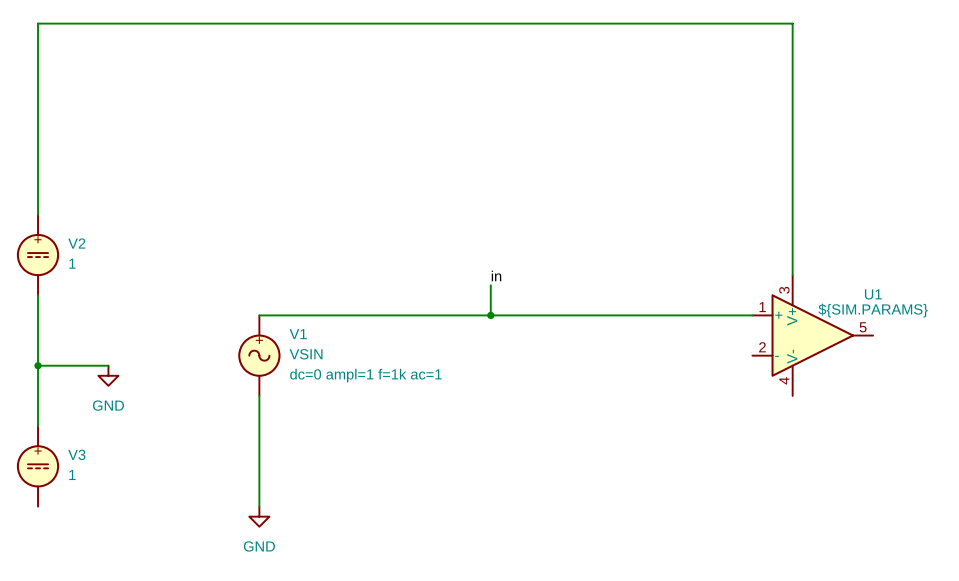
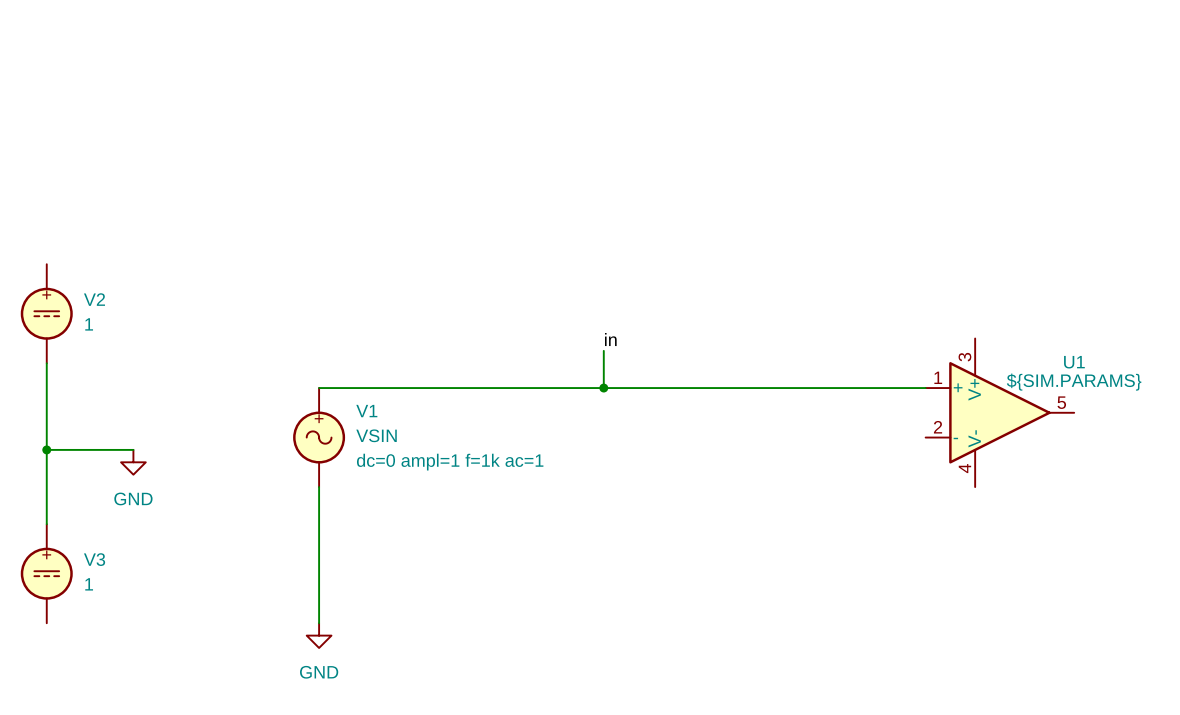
wire: (38, 214) (38, 23) (792, 23) (792, 275) -> none

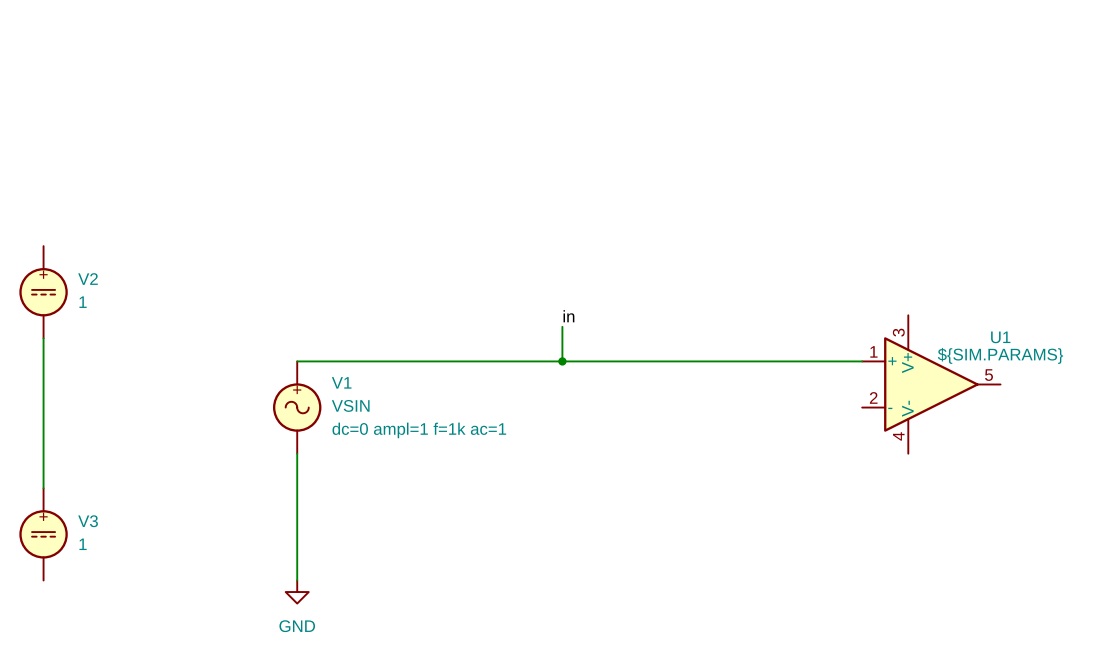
wire: (46, 449) (133, 449) -> none
junction: (46, 449) -> none
power symbol: GND (133, 462) -> none

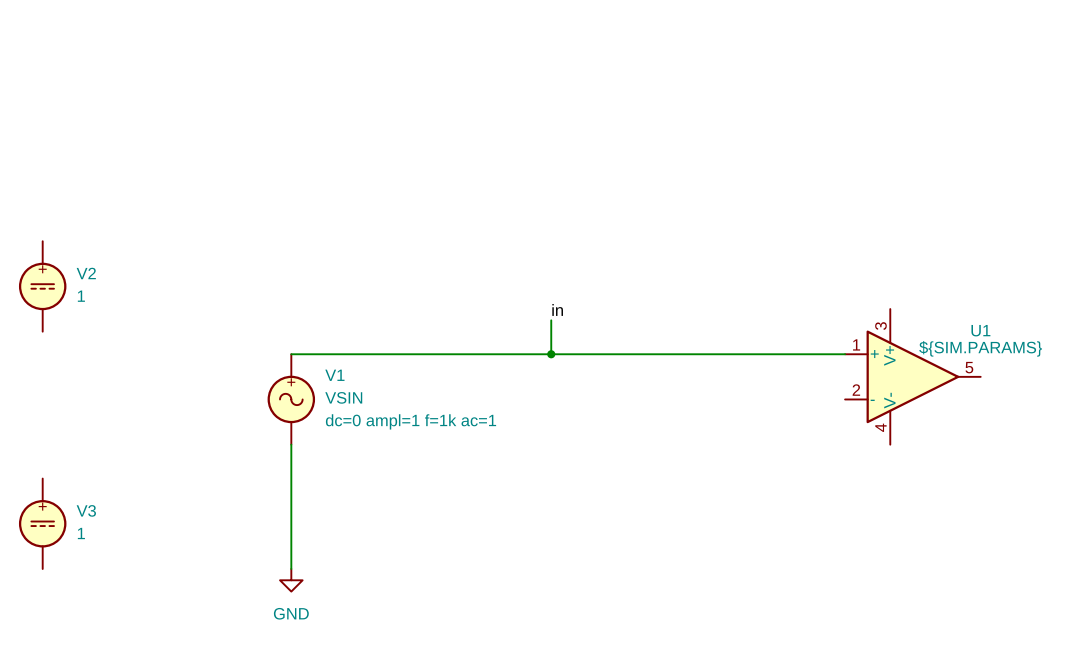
wire: (43, 338) (43, 488) -> none

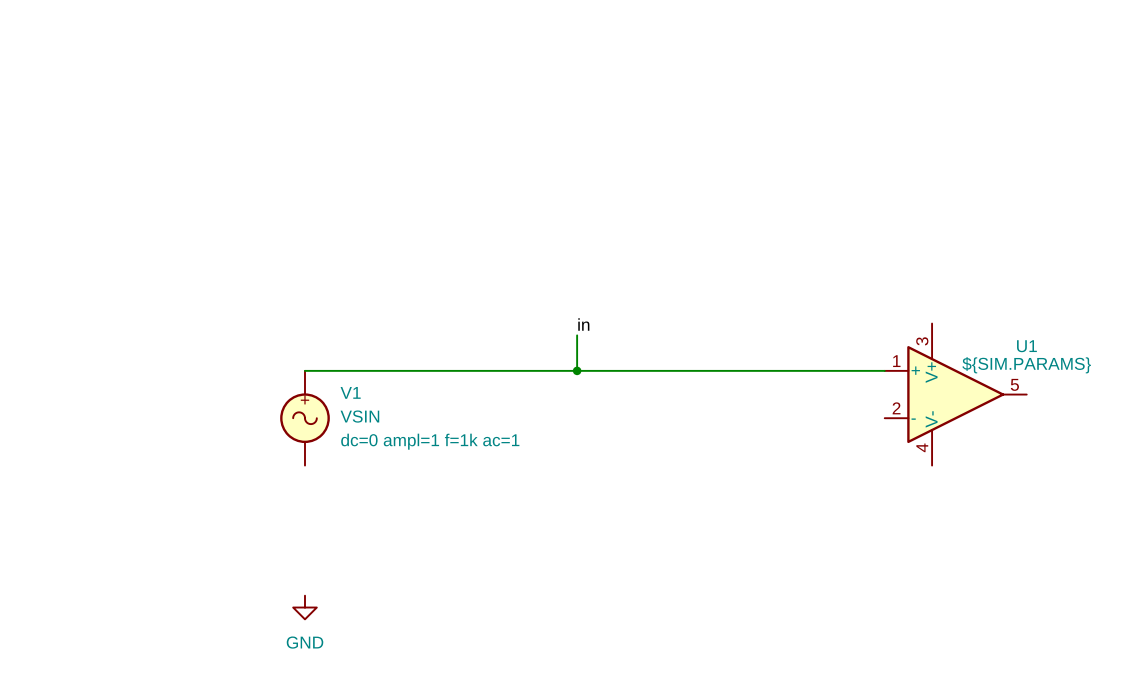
V2: 1 (42, 286) -> none
wire: (291, 444) (291, 568) -> none
V3: 1 (42, 523) -> none

